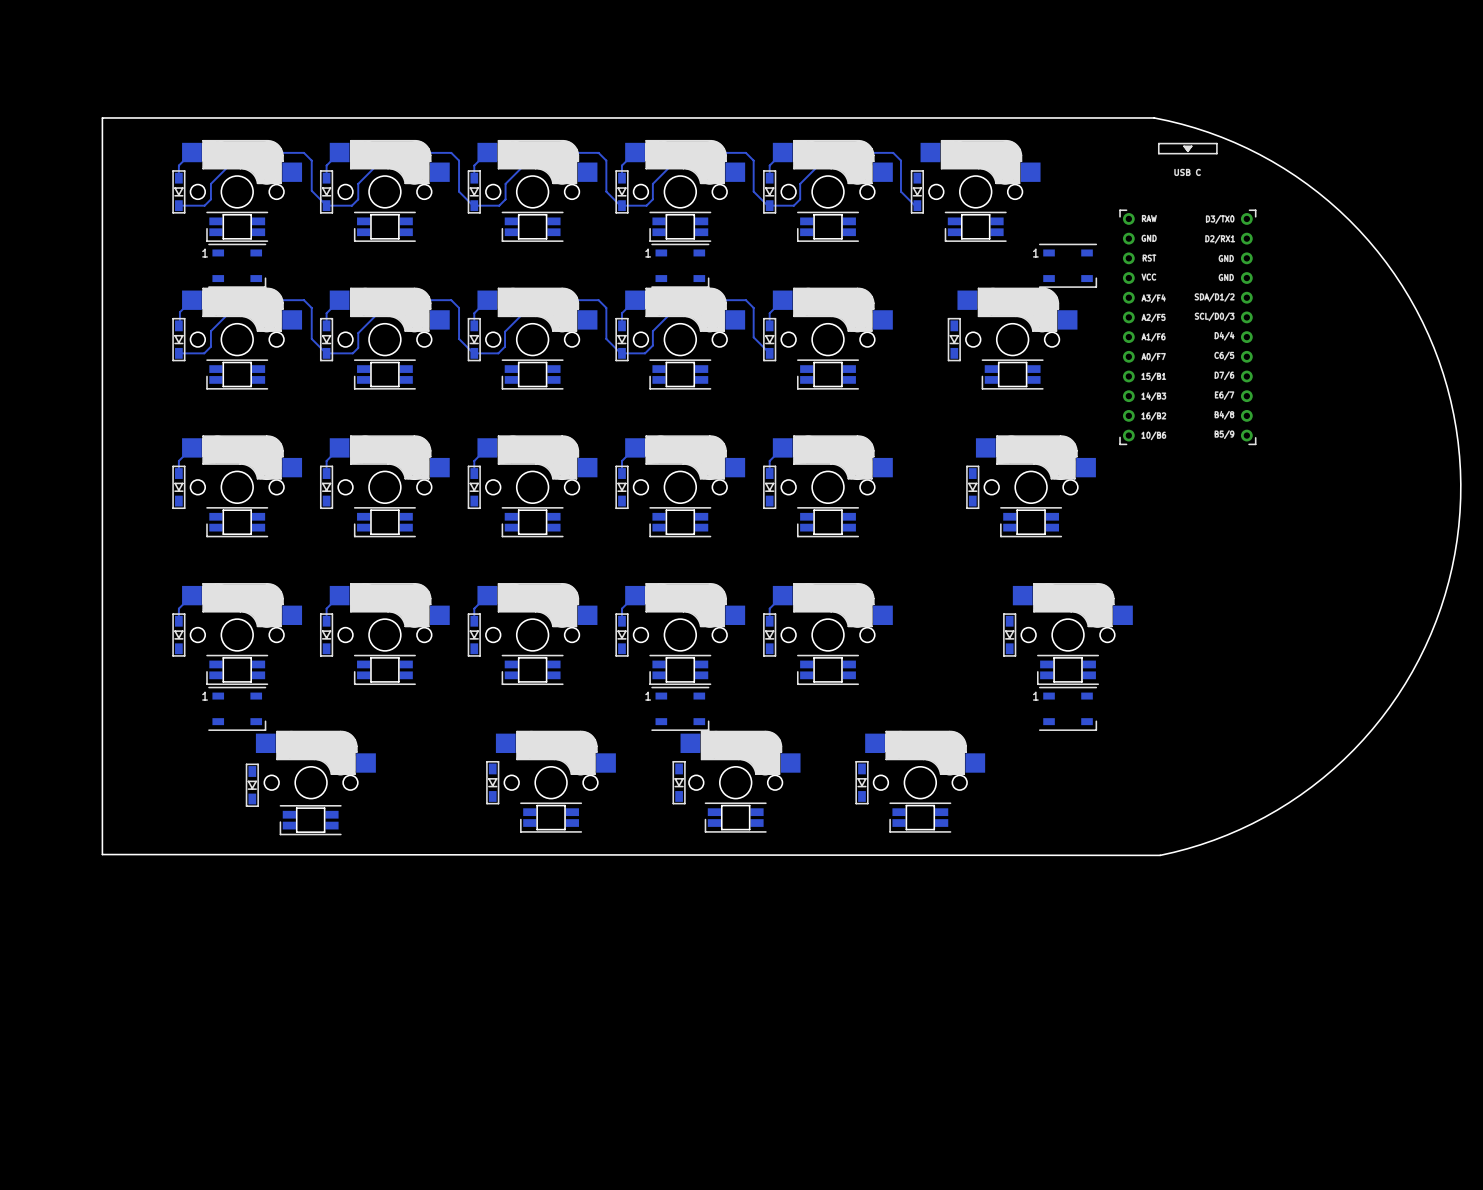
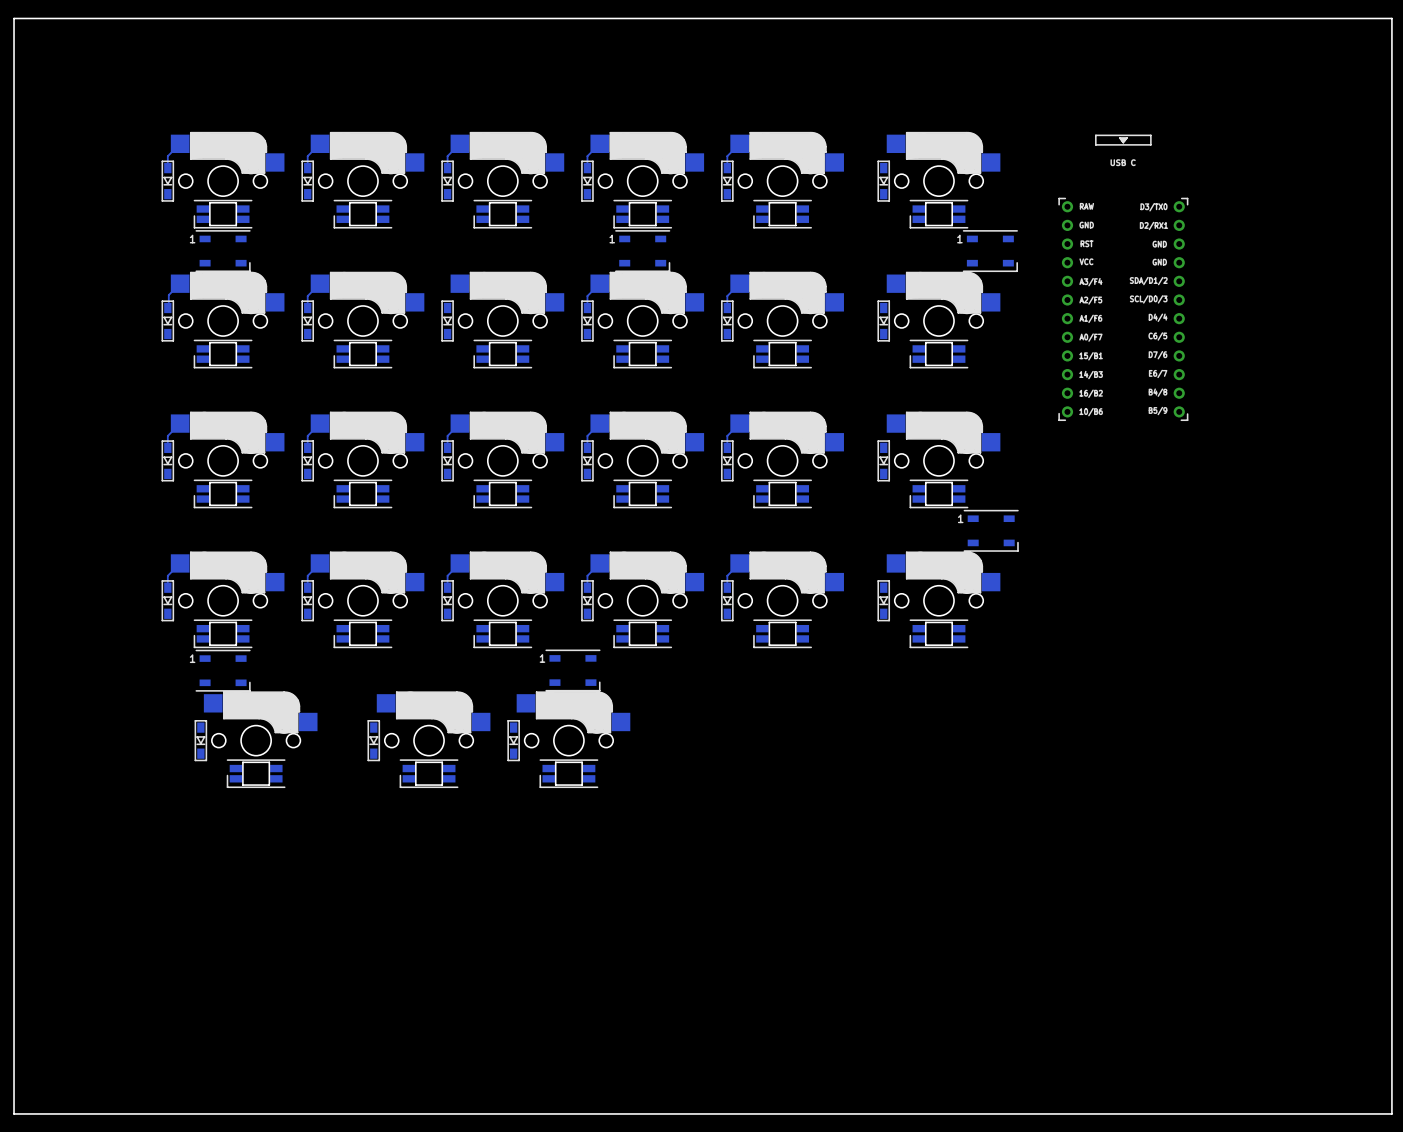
board edge: (1154, 117) (102, 117) (102, 854) (1160, 855) (1187, 848) (1227, 835) (1264, 817) (1300, 795) (1343, 759) (1381, 718) (1412, 671) (1436, 621) (1452, 567) (1460, 512) (1459, 456) (1450, 401) (1438, 360) (1416, 309) (1386, 262) (1349, 220) (1307, 184) (1259, 154) (1208, 132) (1154, 117) -> (1391, 18) (1391, 1113) (14, 1113) (14, 18) (1391, 18)
part position: (980, 173) -> (943, 164)
part position: (917, 191) -> (883, 181)
track: (473, 205) (459, 191) (459, 160) (451, 152) (389, 152) (358, 183) (358, 199) (351, 205) (326, 205) (311, 190) (311, 160) (303, 152) (241, 152) (210, 183) (210, 199) (204, 205) (178, 205) -> none
track: (620, 205) (606, 191) (606, 160) (598, 152) (536, 152) (505, 183) (505, 199) (499, 205) (474, 205) -> none
track: (767, 205) (753, 191) (753, 160) (745, 152) (683, 152) (652, 183) (652, 199) (646, 205) (621, 205) -> none
track: (915, 205) (900, 191) (900, 160) (893, 152) (831, 152) (800, 183) (800, 199) (793, 205) (769, 205) -> none
part position: (975, 226) -> (938, 214)
part position: (1068, 265) -> (990, 251)
track: (487, 300) (474, 313) (474, 325) -> none
part position: (1017, 321) -> (943, 304)
part position: (954, 339) -> (883, 321)
track: (326, 353) (311, 338) (311, 307) (303, 300) (241, 300) (210, 331) (210, 346) (204, 353) (178, 353) -> none
track: (473, 353) (459, 338) (459, 307) (451, 300) (391, 300) (358, 333) (358, 347) (352, 353) (326, 353) -> none
track: (620, 353) (606, 338) (606, 307) (598, 300) (536, 300) (505, 331) (505, 346) (498, 353) (474, 353) -> none
track: (769, 353) (753, 337) (753, 307) (745, 300) (683, 300) (652, 331) (652, 345) (645, 353) (621, 353) -> none
part position: (1012, 374) -> (938, 354)
part position: (1035, 469) -> (943, 443)
part position: (972, 487) -> (883, 460)
part position: (1031, 522) -> (938, 493)
part: none -> (991, 530)
part position: (1072, 617) -> (943, 583)
part position: (1009, 635) -> (883, 600)
part position: (1068, 669) -> (938, 633)
part position: (680, 708) -> (572, 670)
part: (1068, 708) -> none
part position: (315, 764) -> (260, 723)
part: none -> (433, 723)
part: (555, 764) -> none
part: none -> (573, 723)
part: (740, 764) -> none
part: (925, 764) -> none
part: none -> (373, 740)
part: (492, 782) -> none
part: none -> (513, 740)
part: (679, 782) -> none
part: (861, 782) -> none
part position: (252, 785) -> (200, 740)
part: none -> (429, 773)
part: (551, 817) -> none
part: none -> (568, 773)
part: (735, 817) -> none
part: (920, 817) -> none
part position: (310, 820) -> (256, 773)

